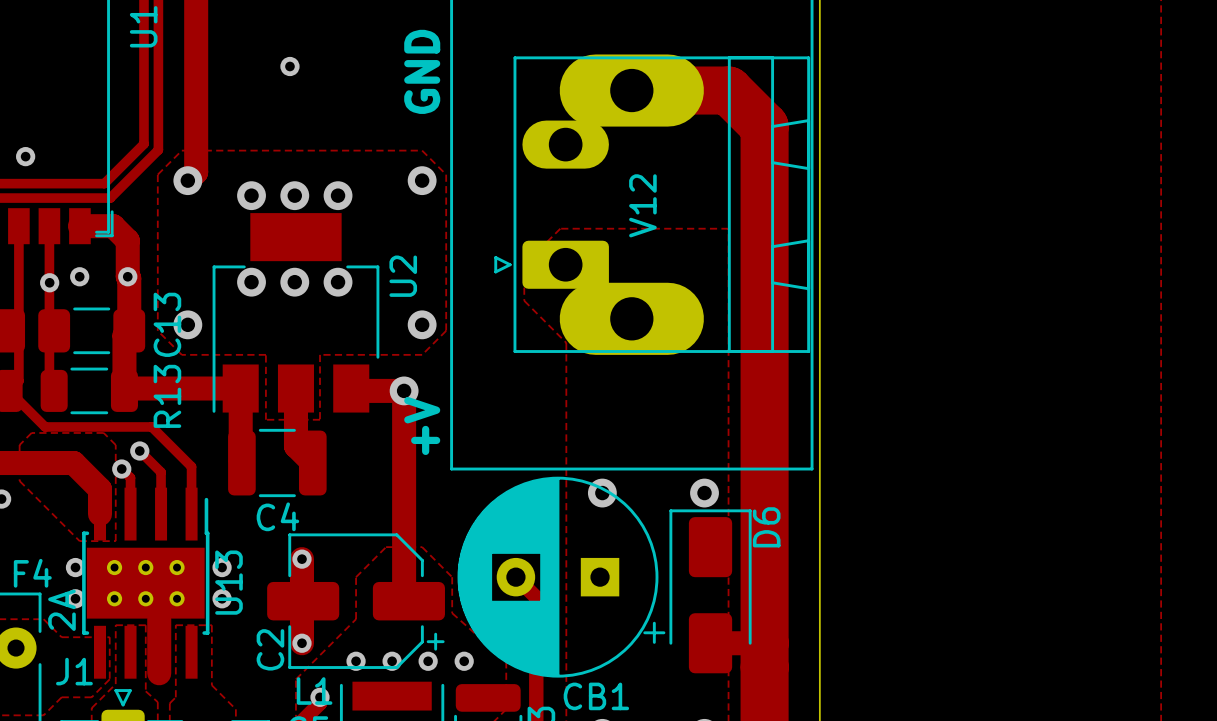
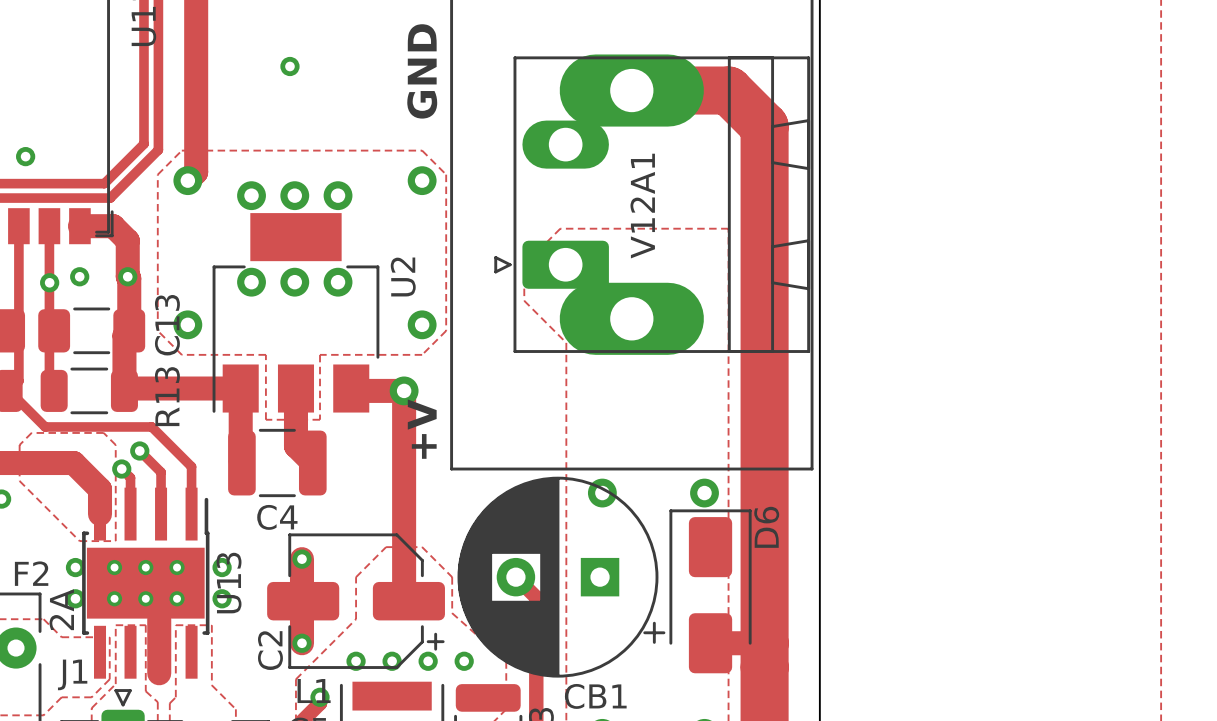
V12 name: V12 (642, 205) -> V12A1 (642, 206)
F4 name: F4 (32, 573) -> F2 (31, 573)

